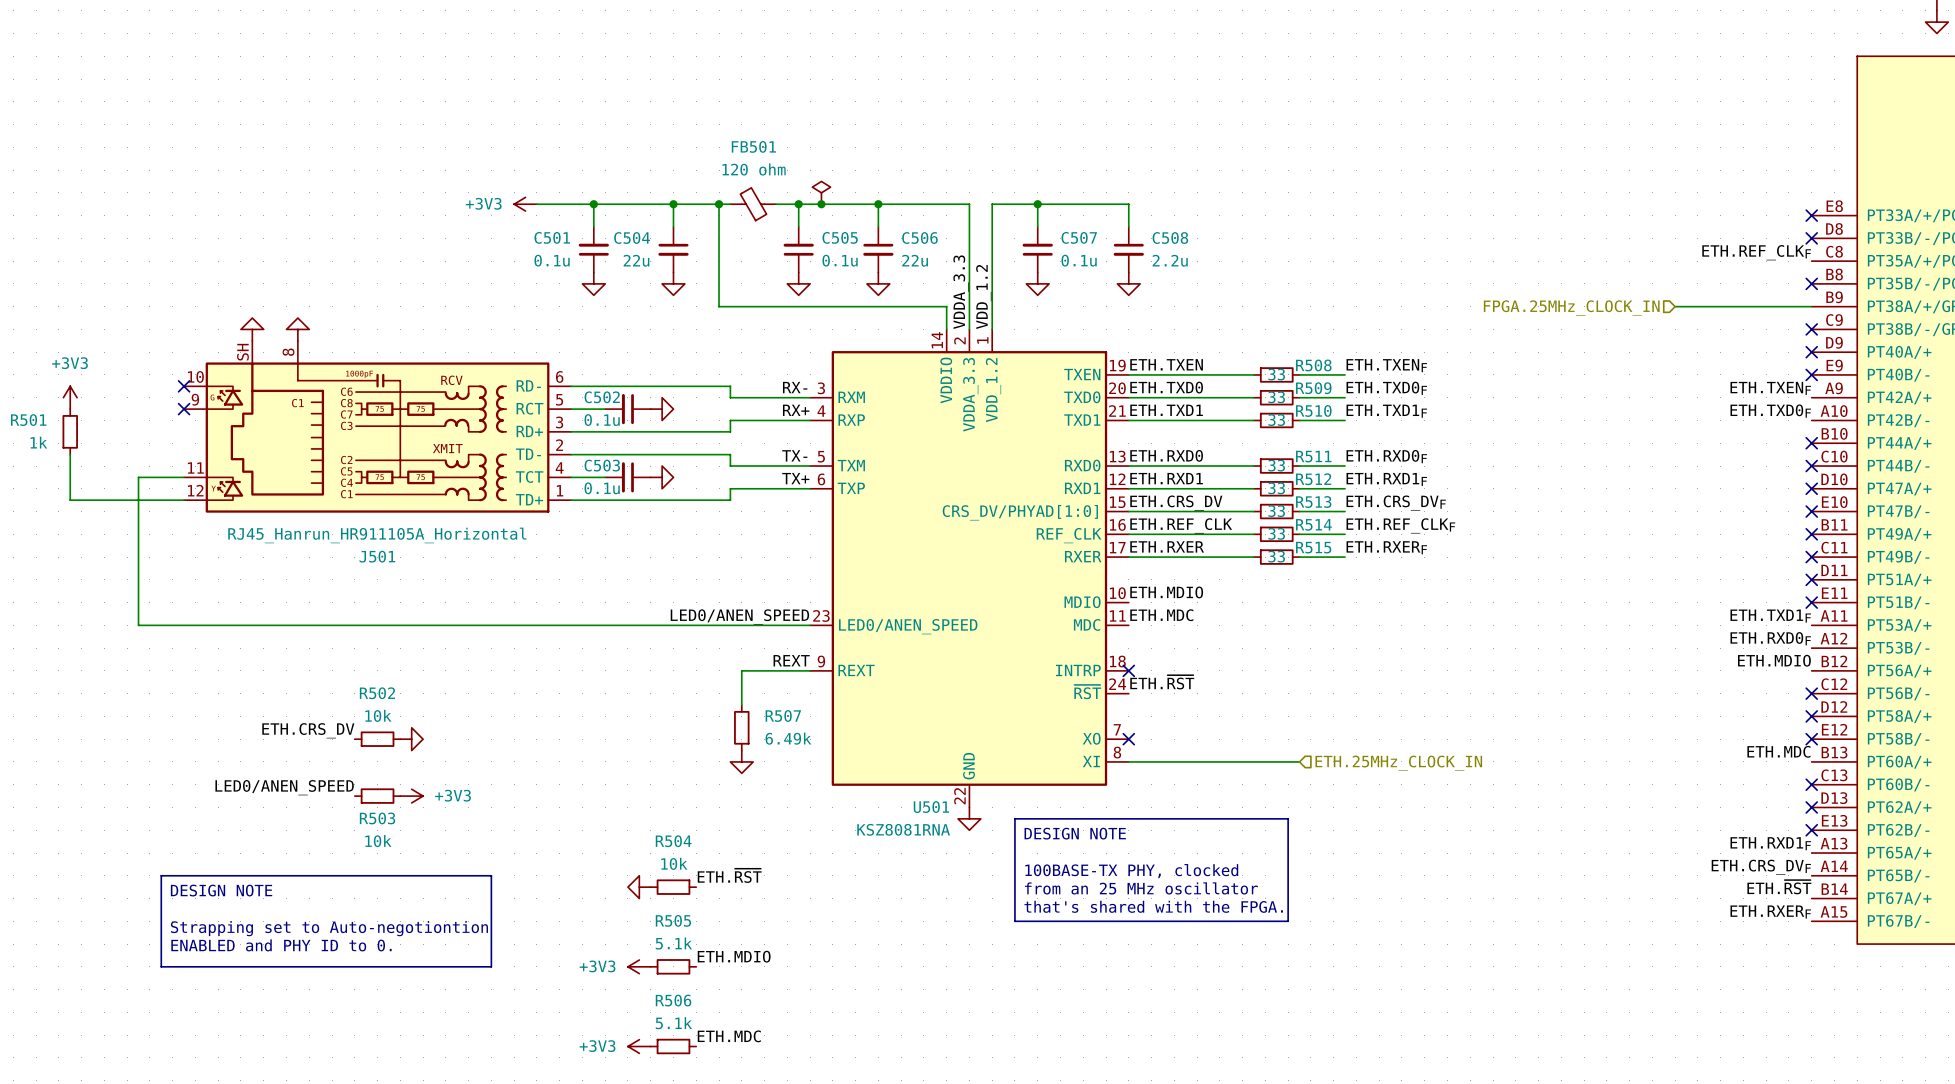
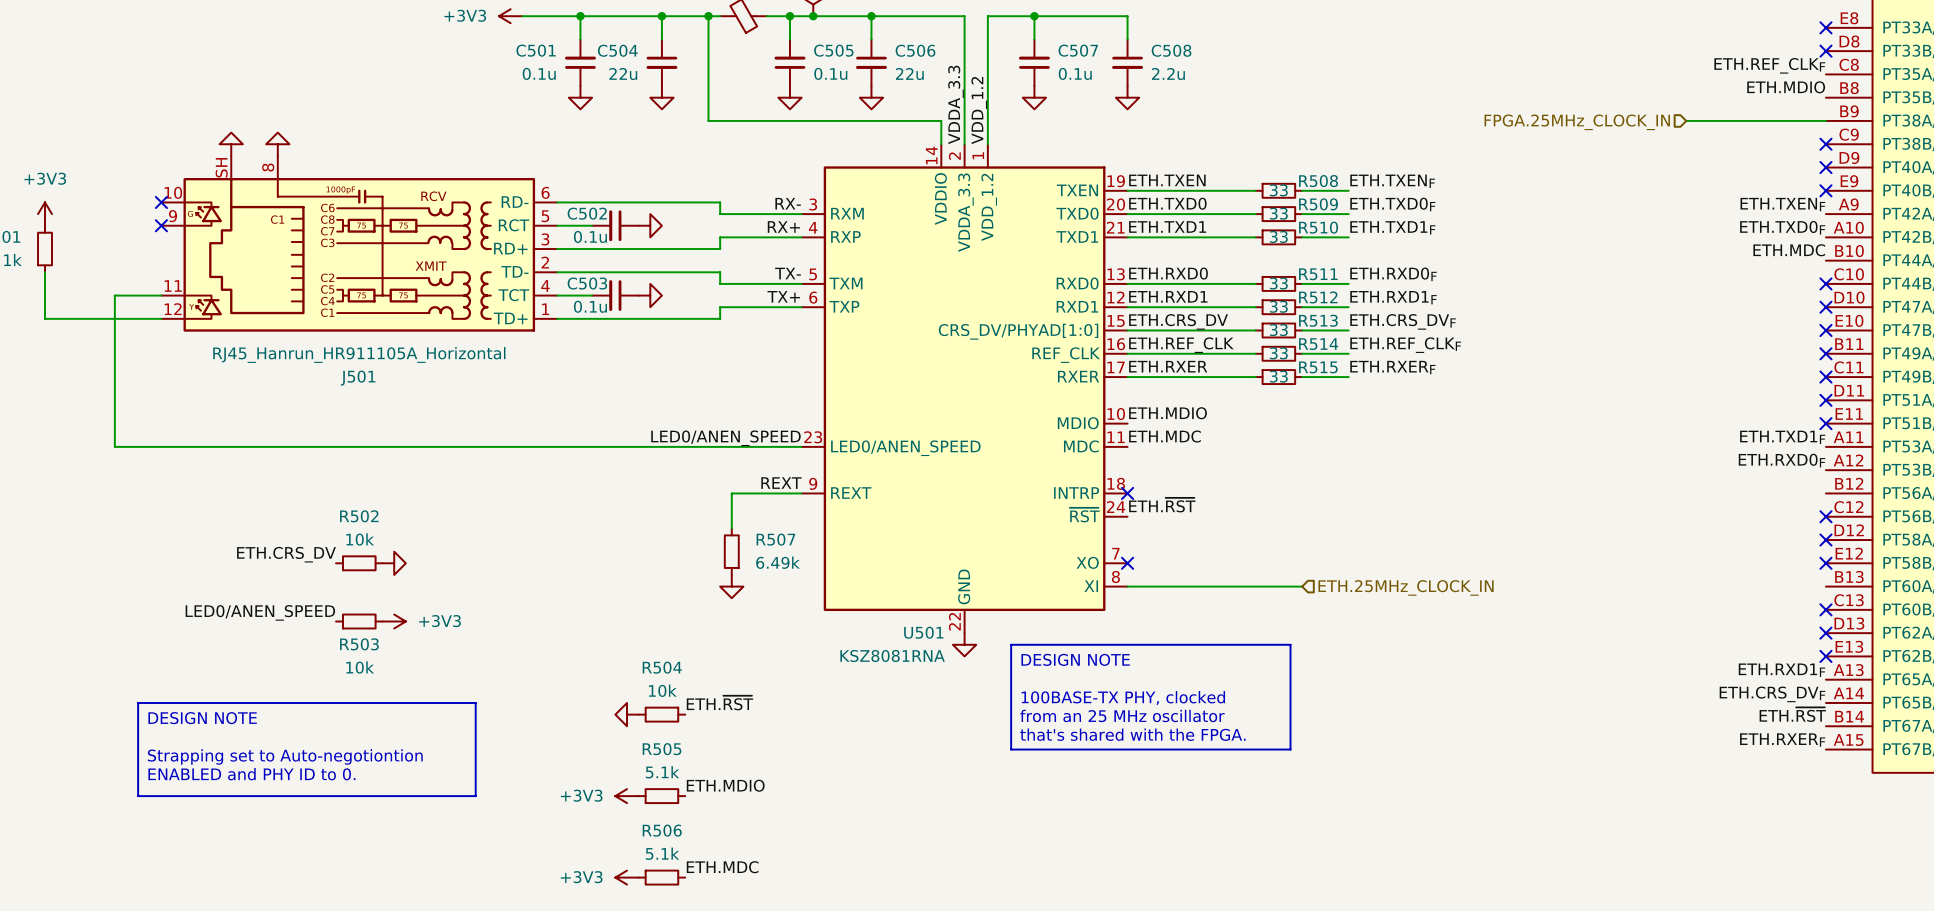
label: none -> ETH.MDIO (1786, 87)
no-connect mark: (1811, 283) -> none
label: none -> ETH.MDC (1789, 250)
no-connect mark: (1811, 443) -> none
label: ETH.MDIO (1774, 660) -> none
label: ETH.MDC (1778, 751) -> none

